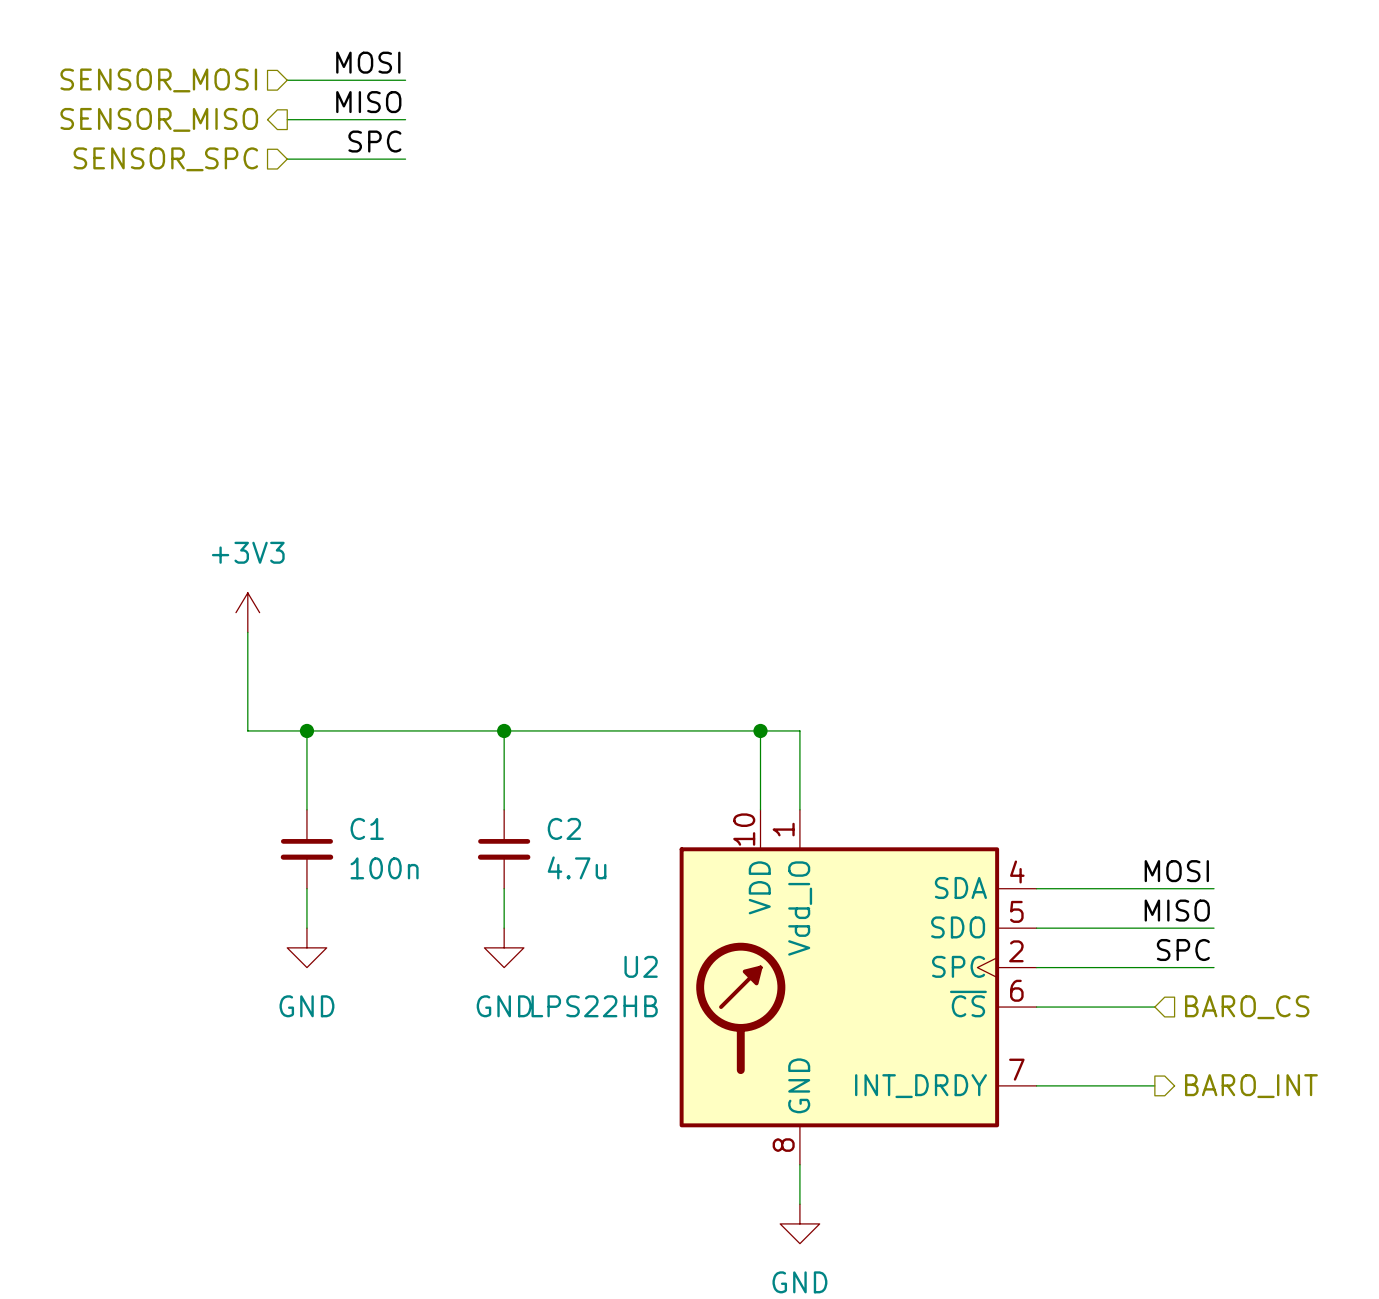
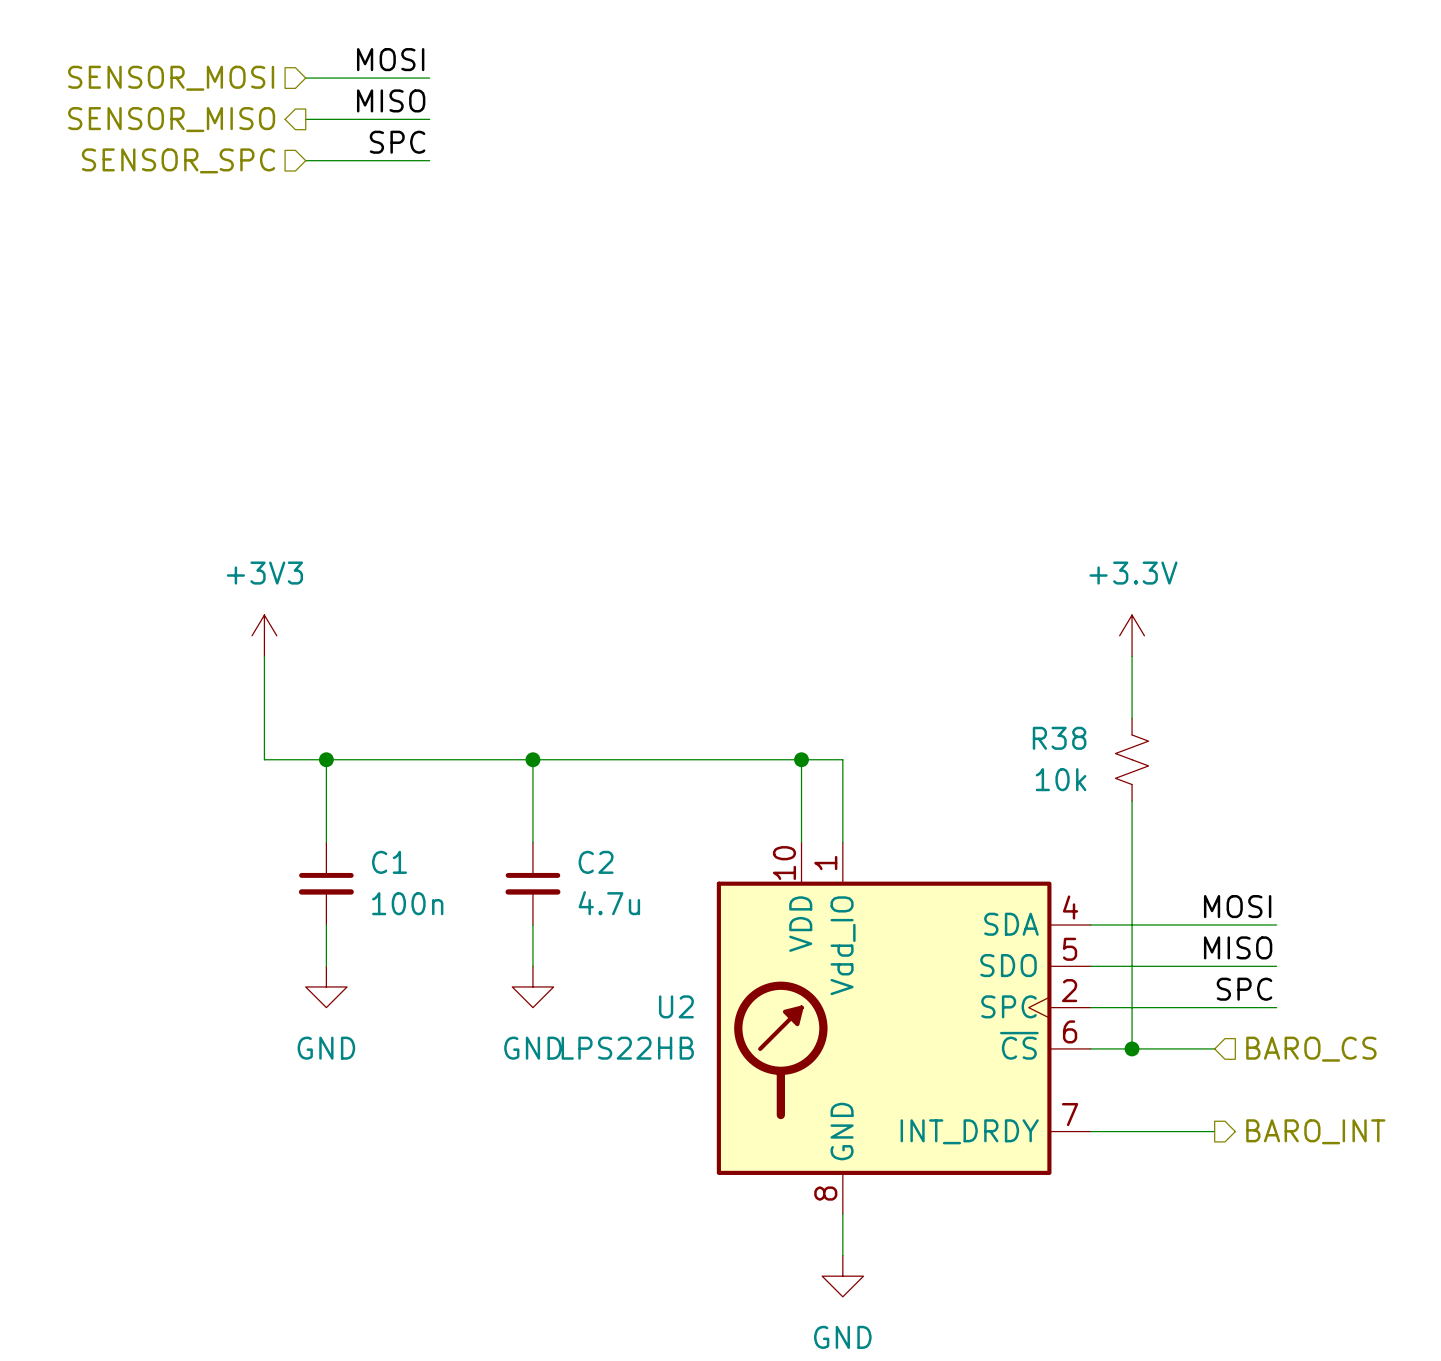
power symbol: none -> +3.3V (1132, 635)
wire: none -> (1132, 656) (1132, 718)
R38: none -> 10k (1132, 759)
wire: none -> (1132, 801) (1132, 1048)
junction: none -> (1132, 1048)

